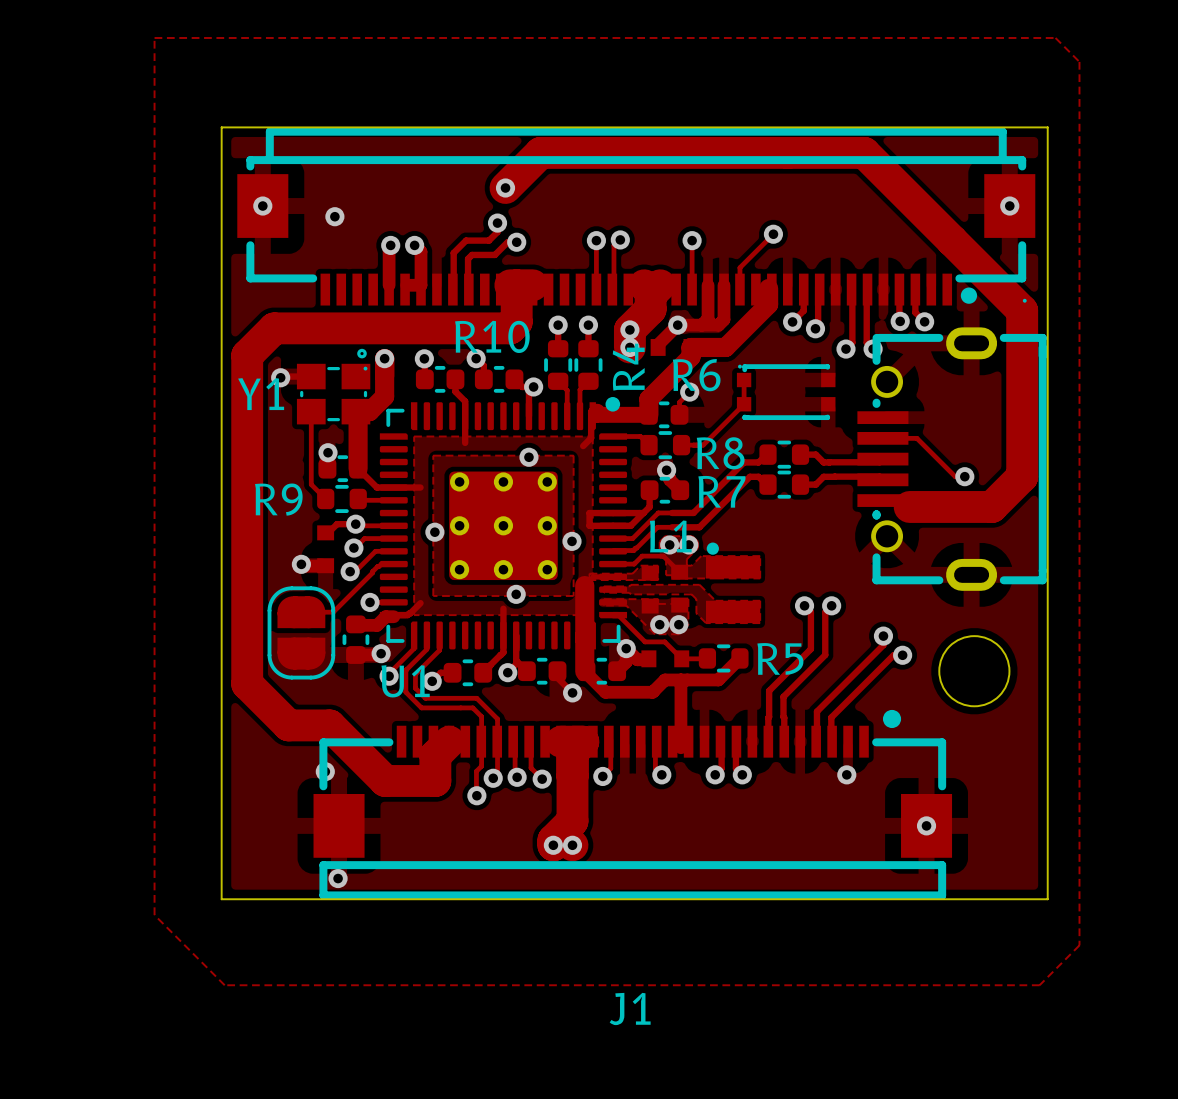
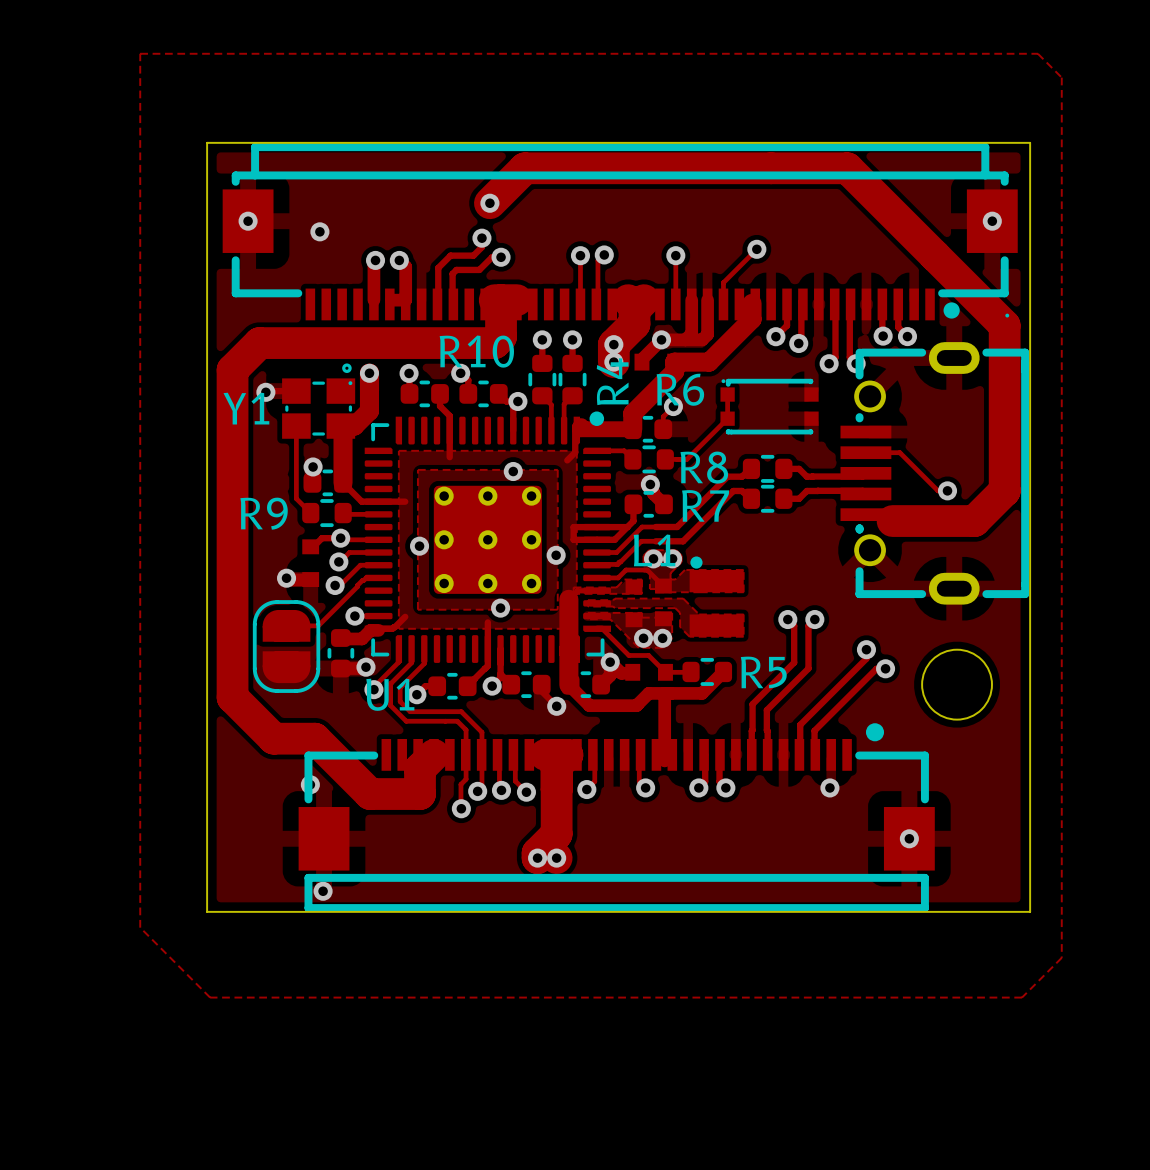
J1 name: J1 (630, 1009) -> none

